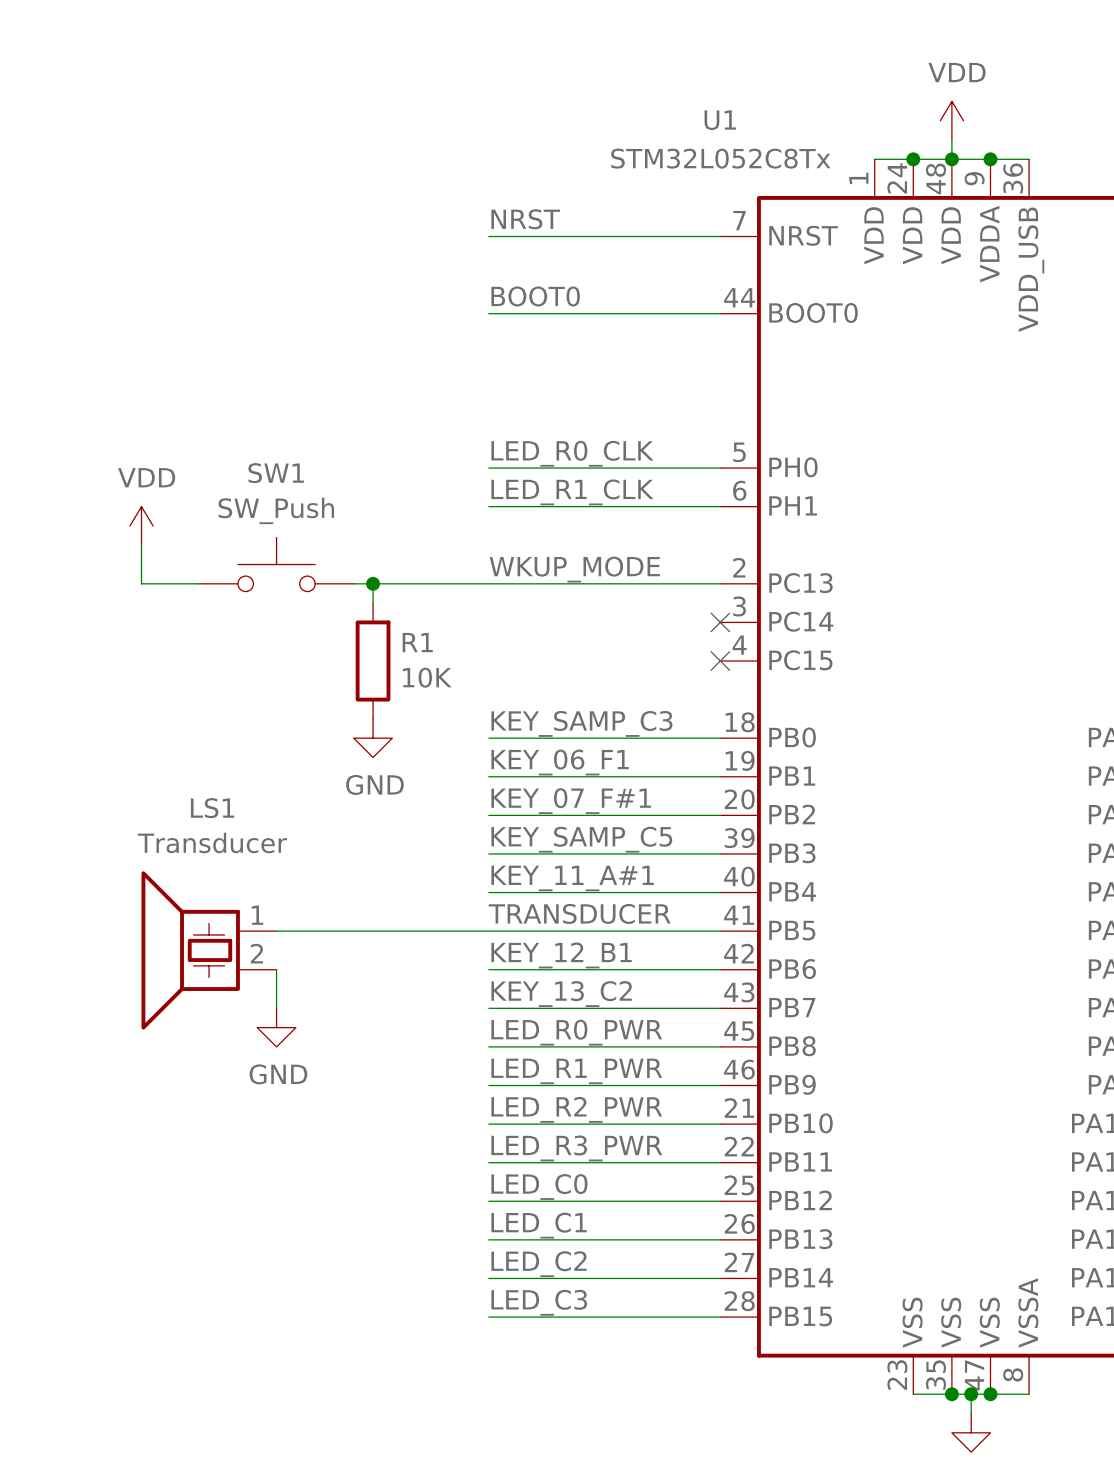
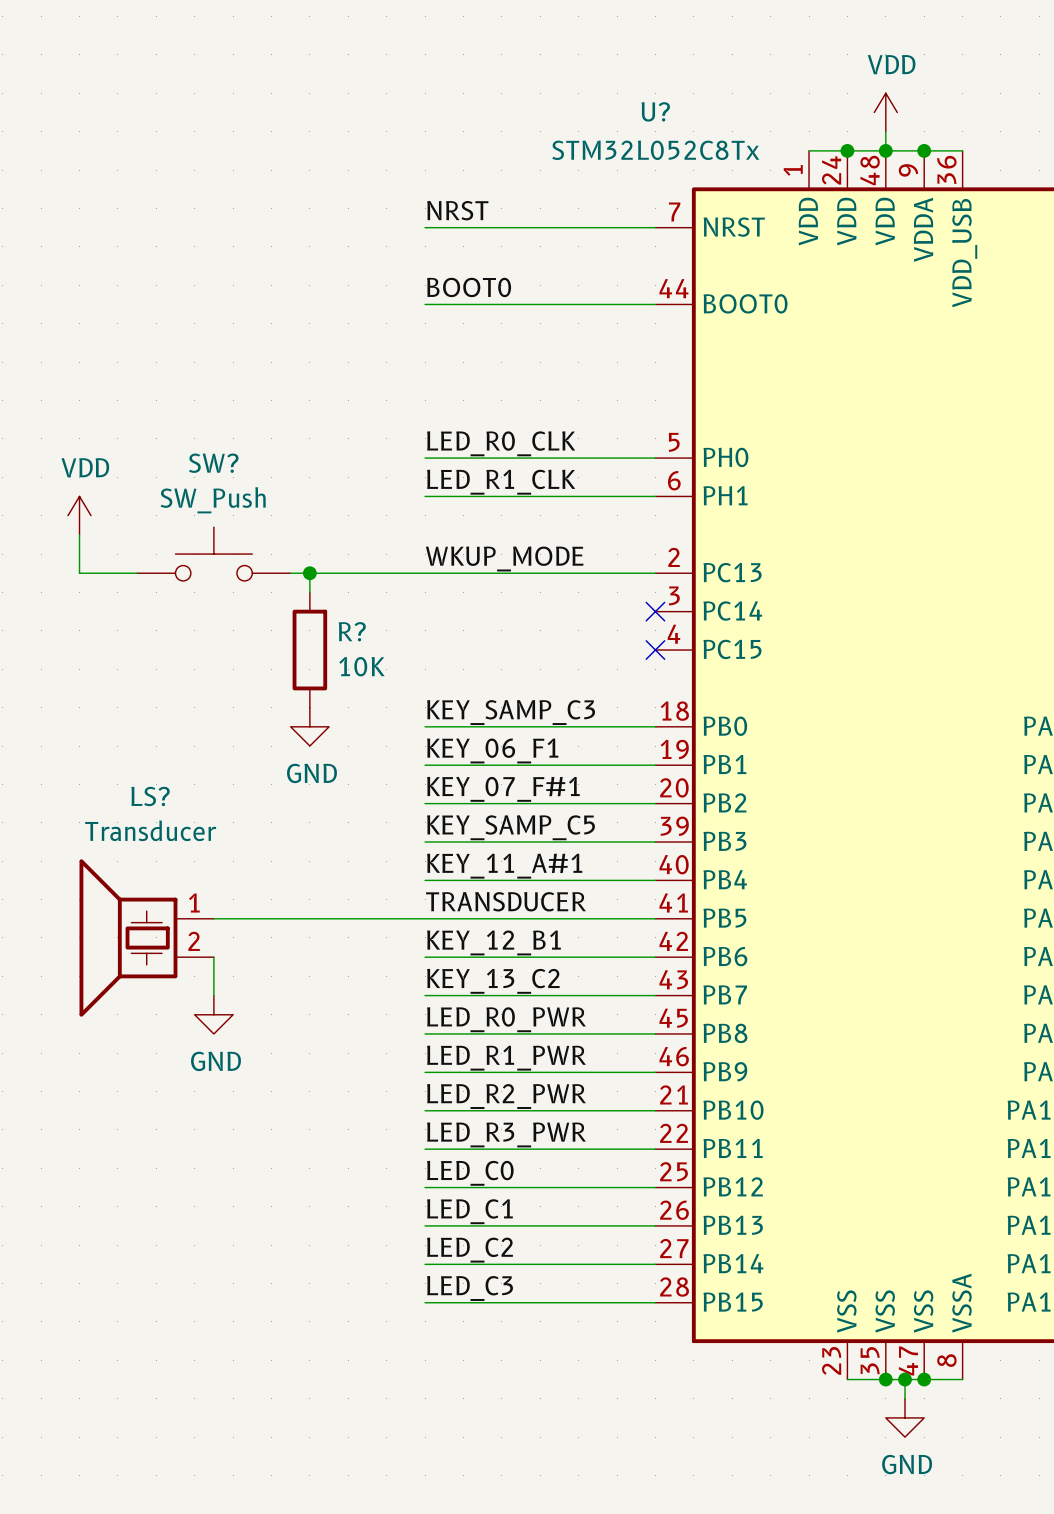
U1 name: U1 (720, 120) -> U? (655, 111)
SW1 name: SW1 (276, 473) -> SW? (213, 463)
R1 name: R1 (417, 642) -> R? (352, 631)
LS1 name: LS1 (212, 808) -> LS? (150, 796)

